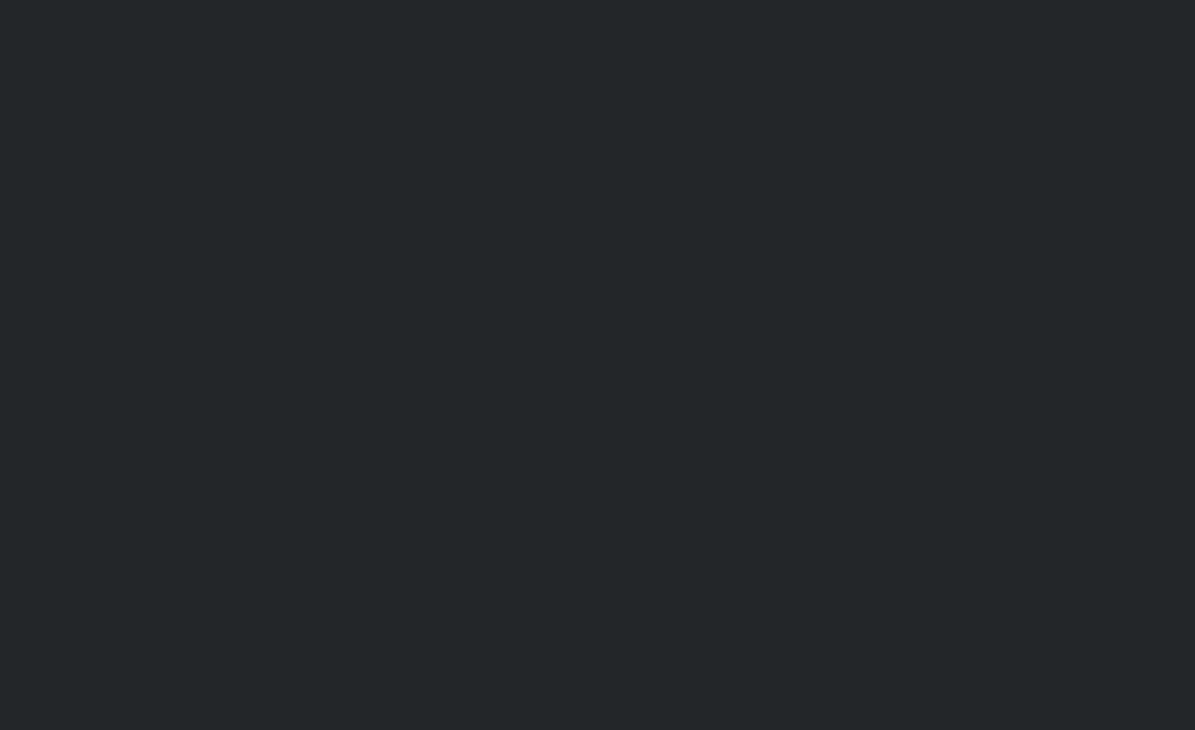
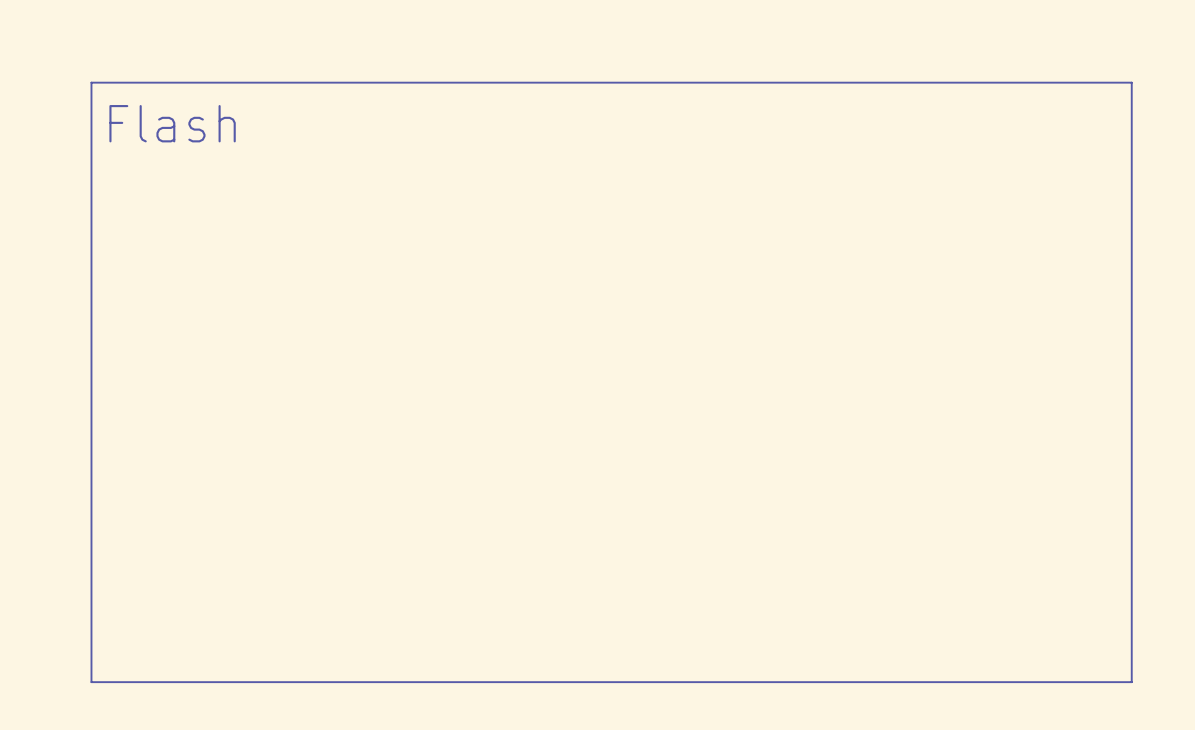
line: none -> (91, 82) (1131, 82) (1131, 682) (91, 682) (91, 82)
text: none -> Flash (172, 123)

